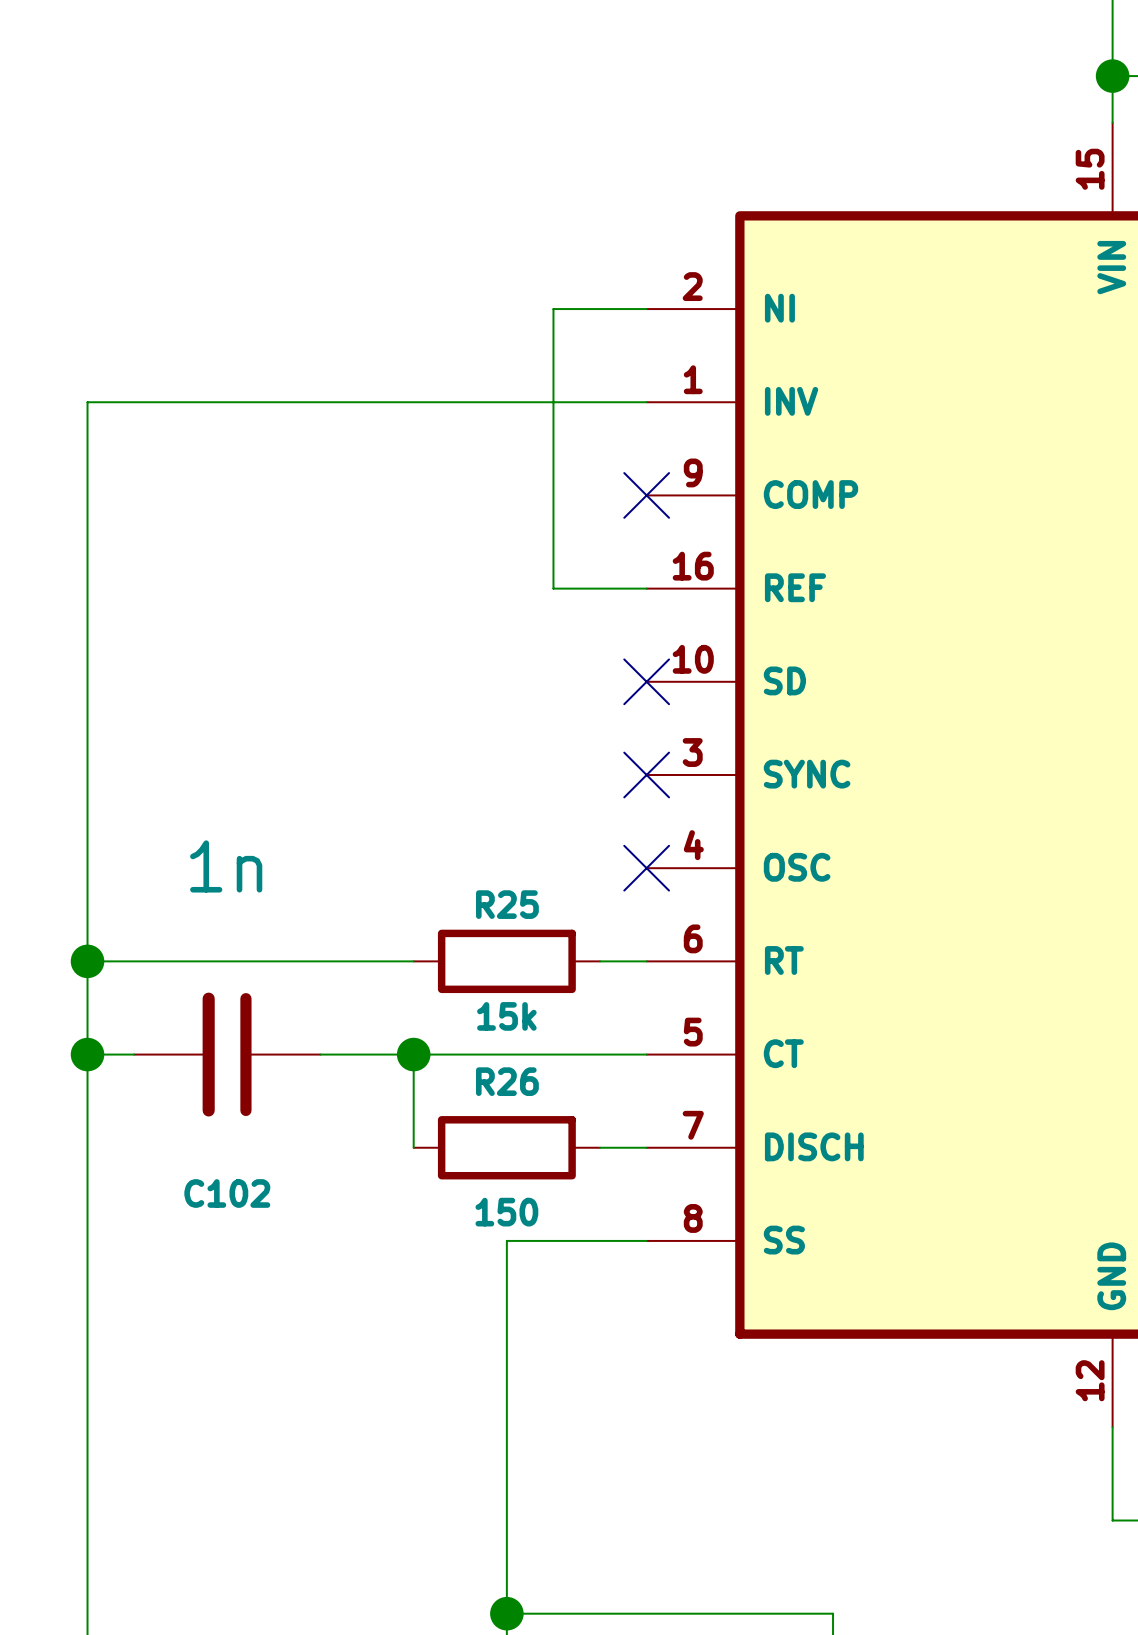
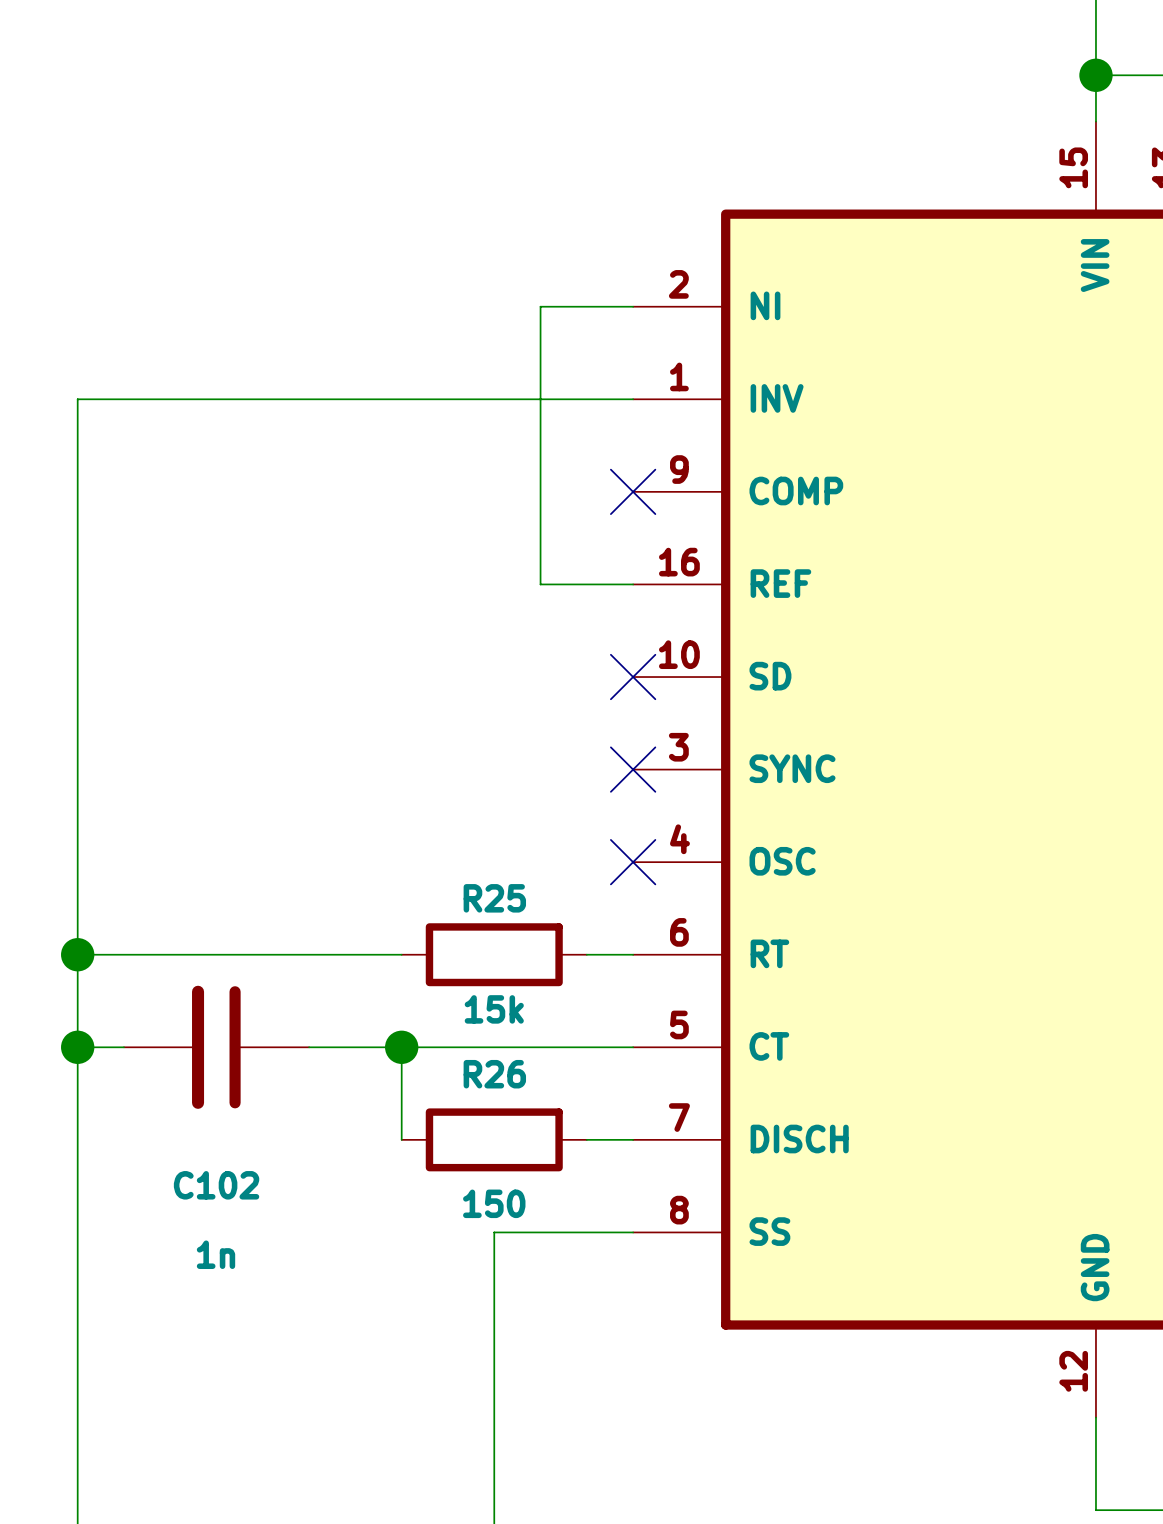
C102 text: 1n (226, 866) -> none
C102 value: none -> 1n (216, 1254)

